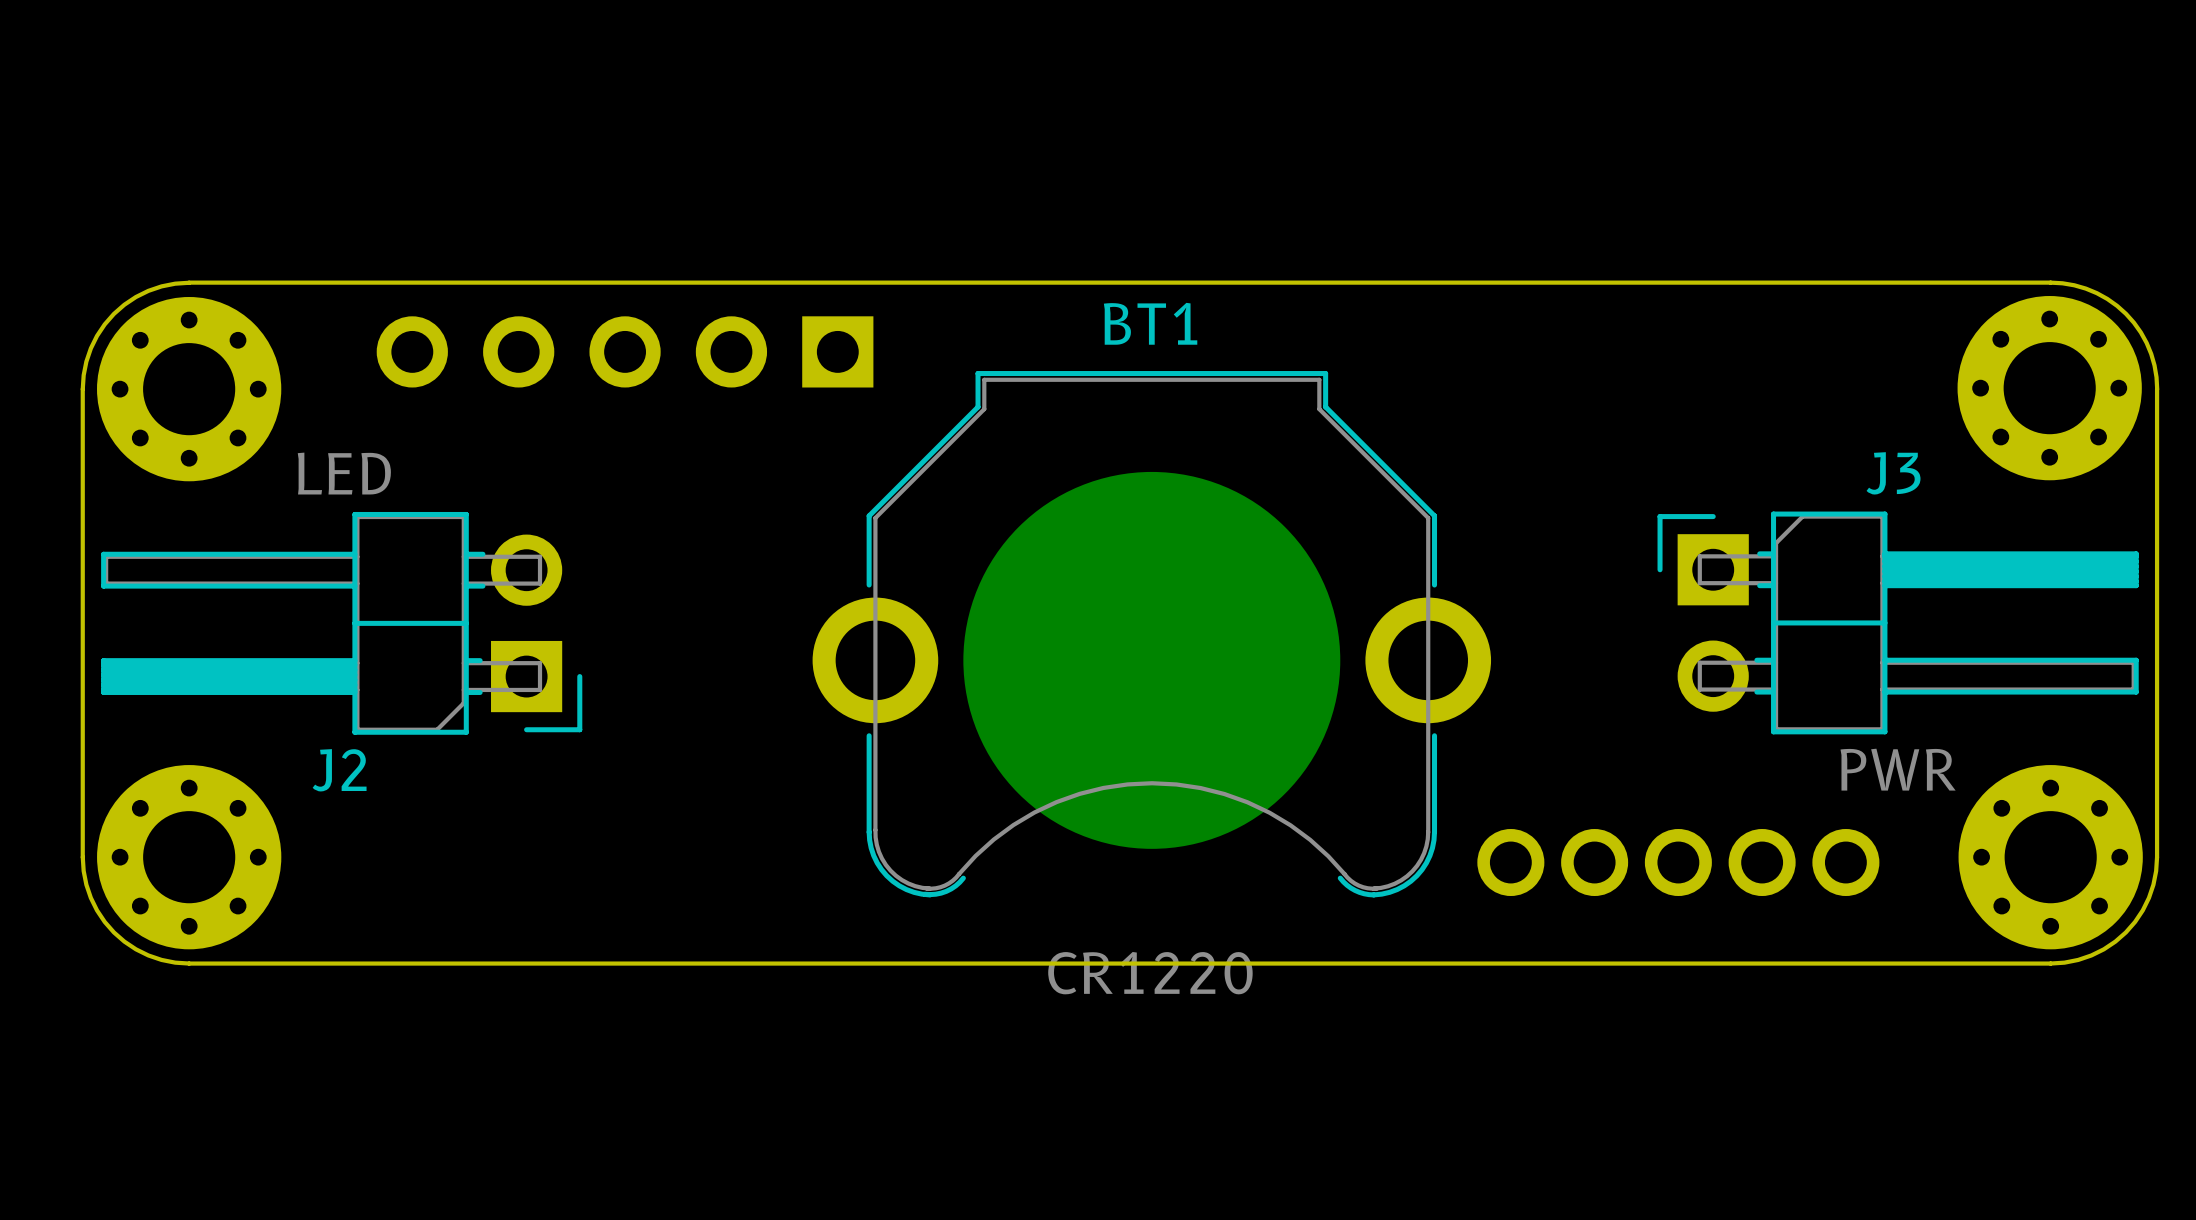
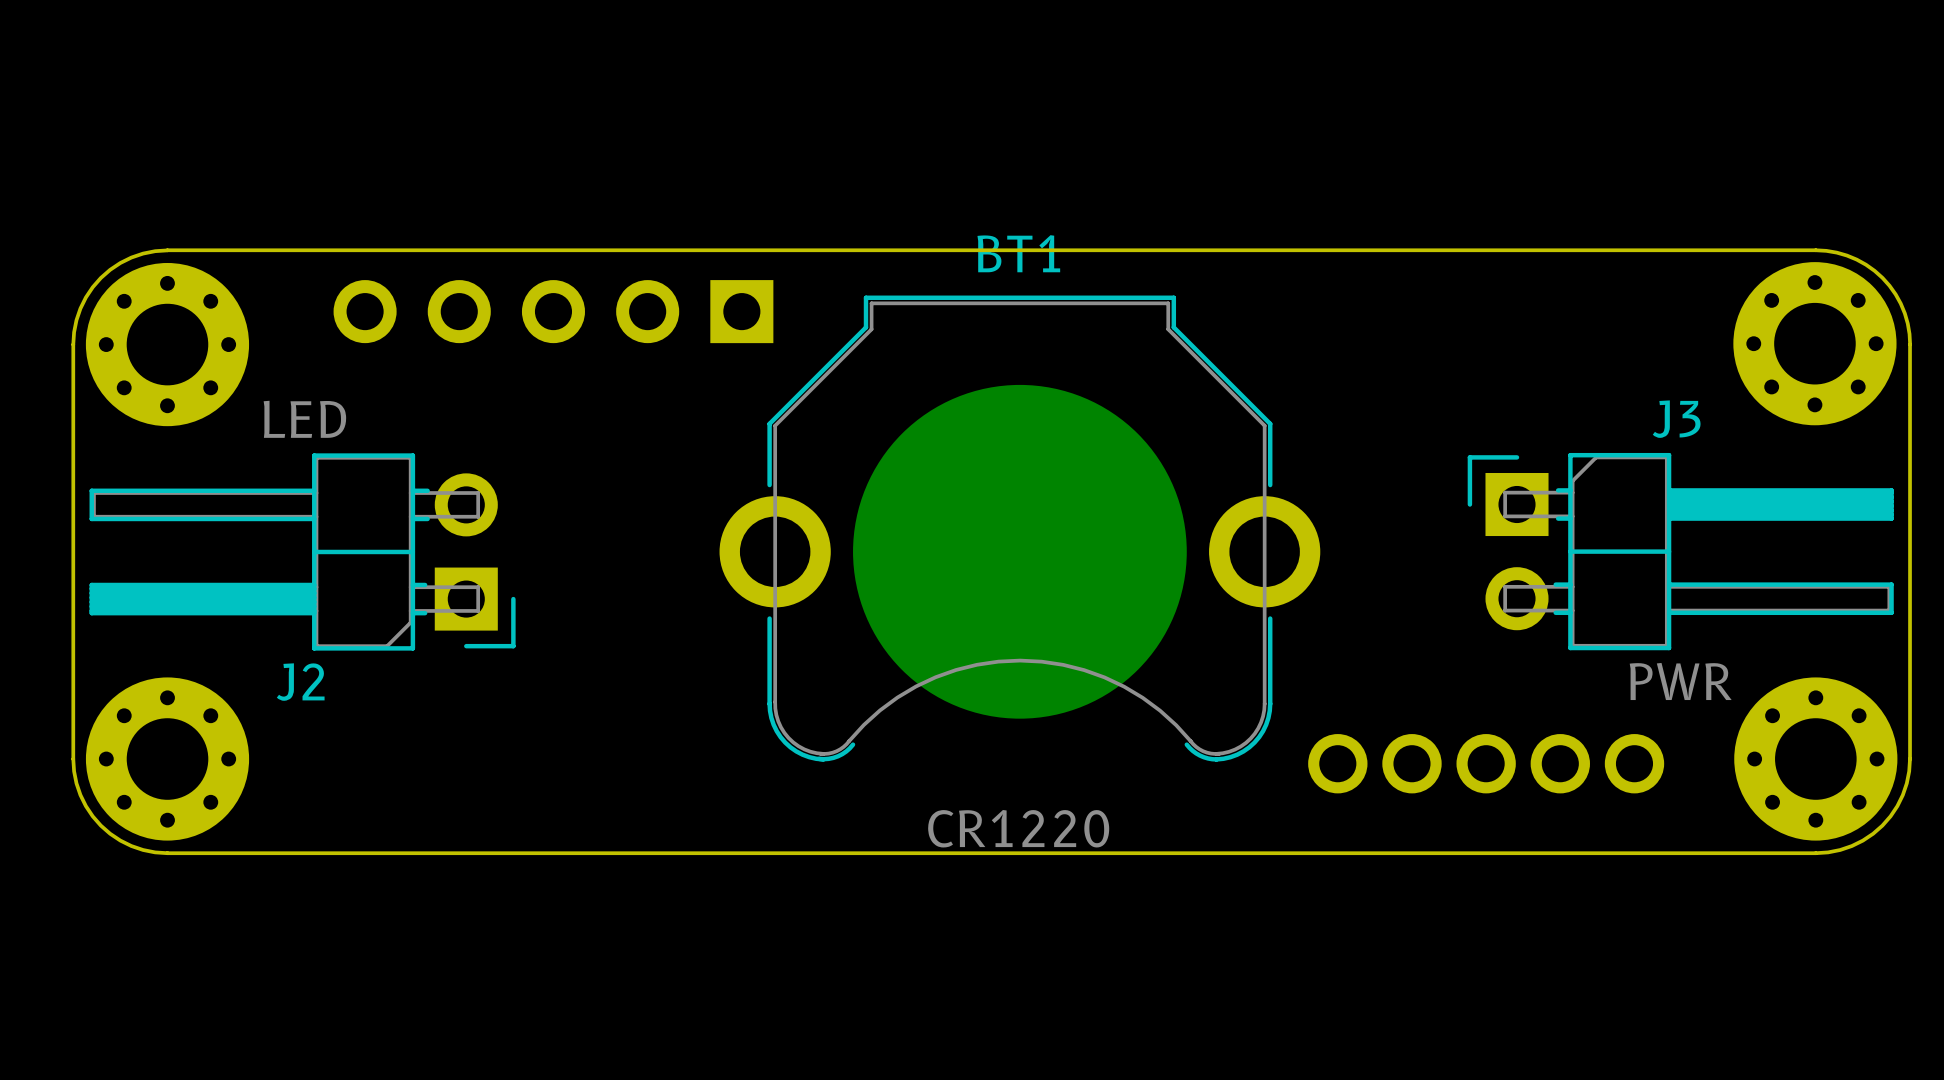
BT1 position: (1151, 634) -> (1019, 528)

